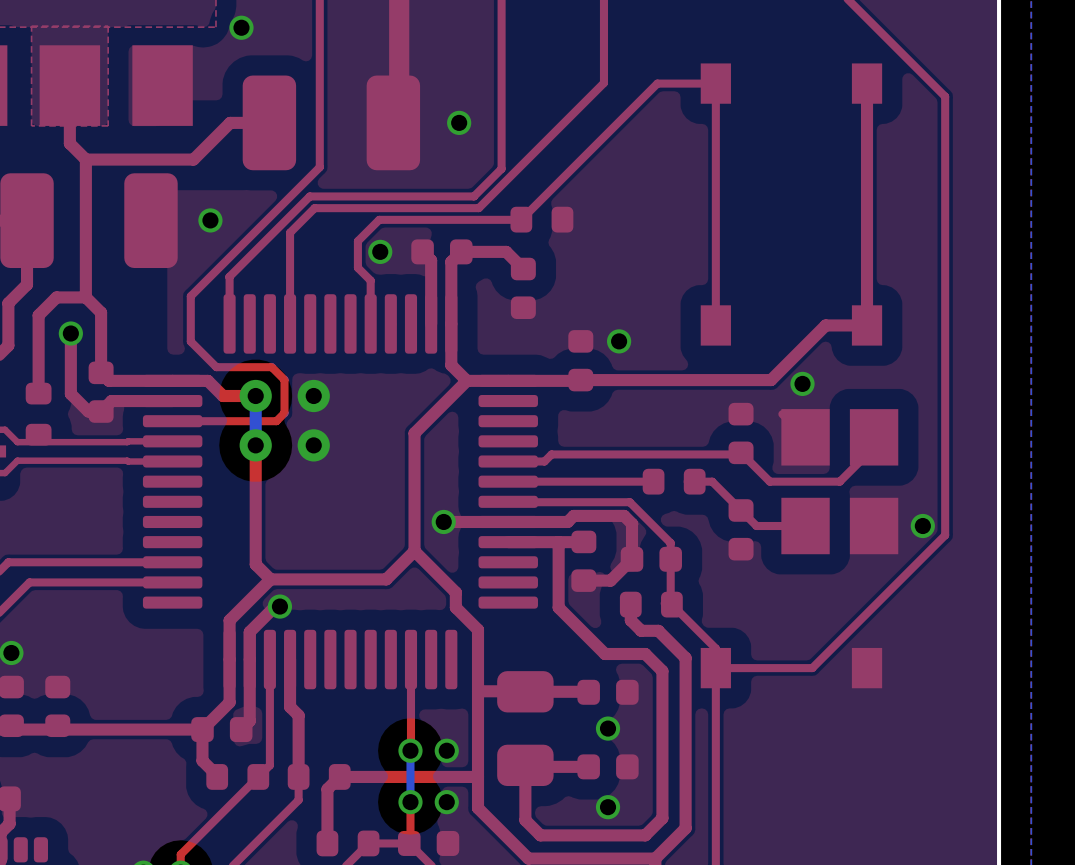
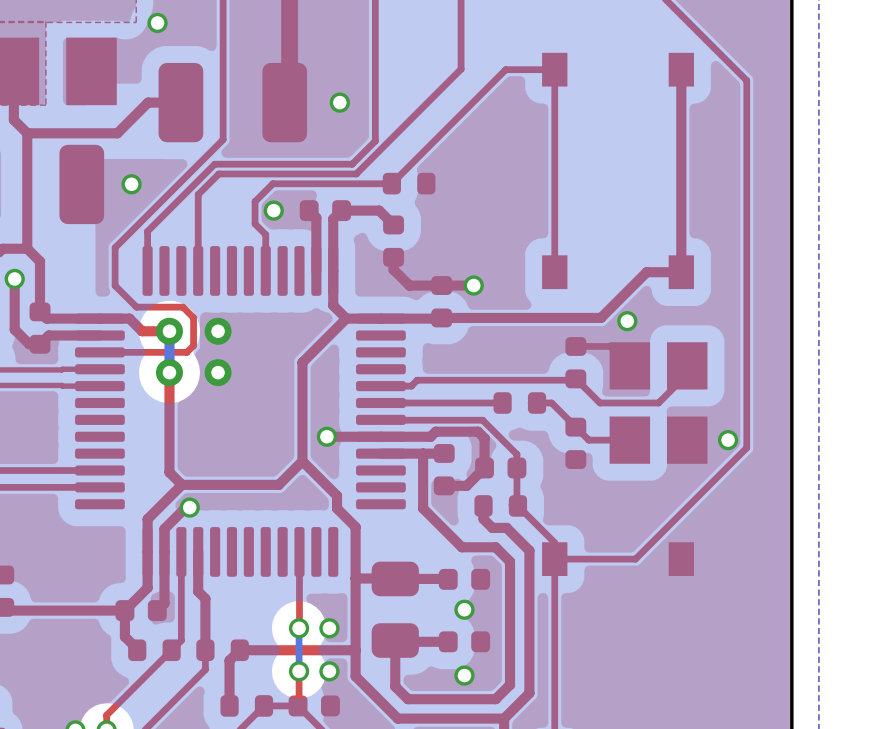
top track: none -> (393, 257) (393, 269) (409, 285) (473, 285)
top track: none -> (610, 346) (575, 346)

